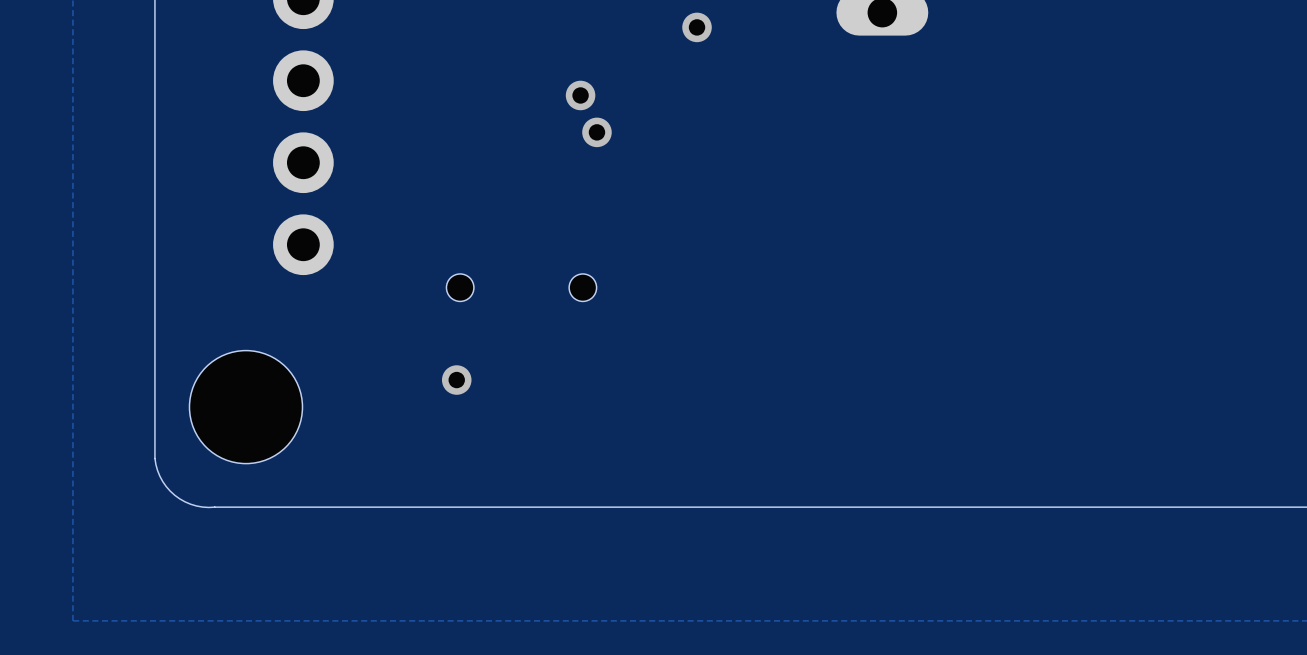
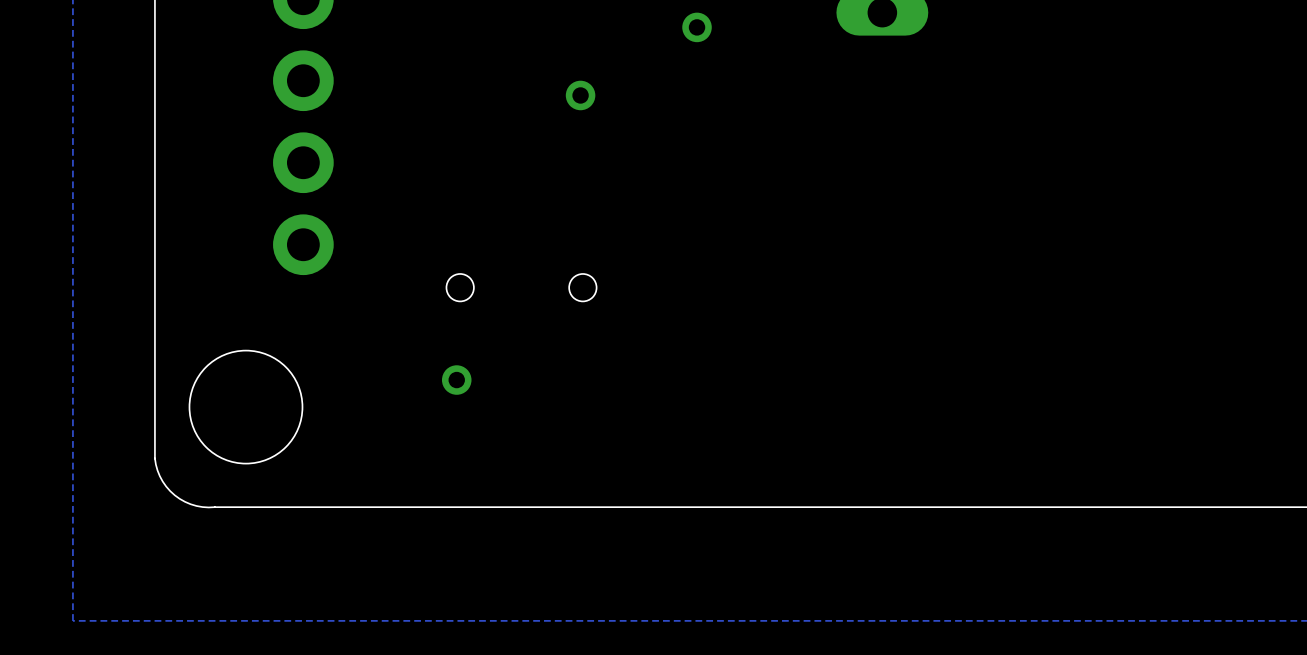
via: (596, 132) -> none

